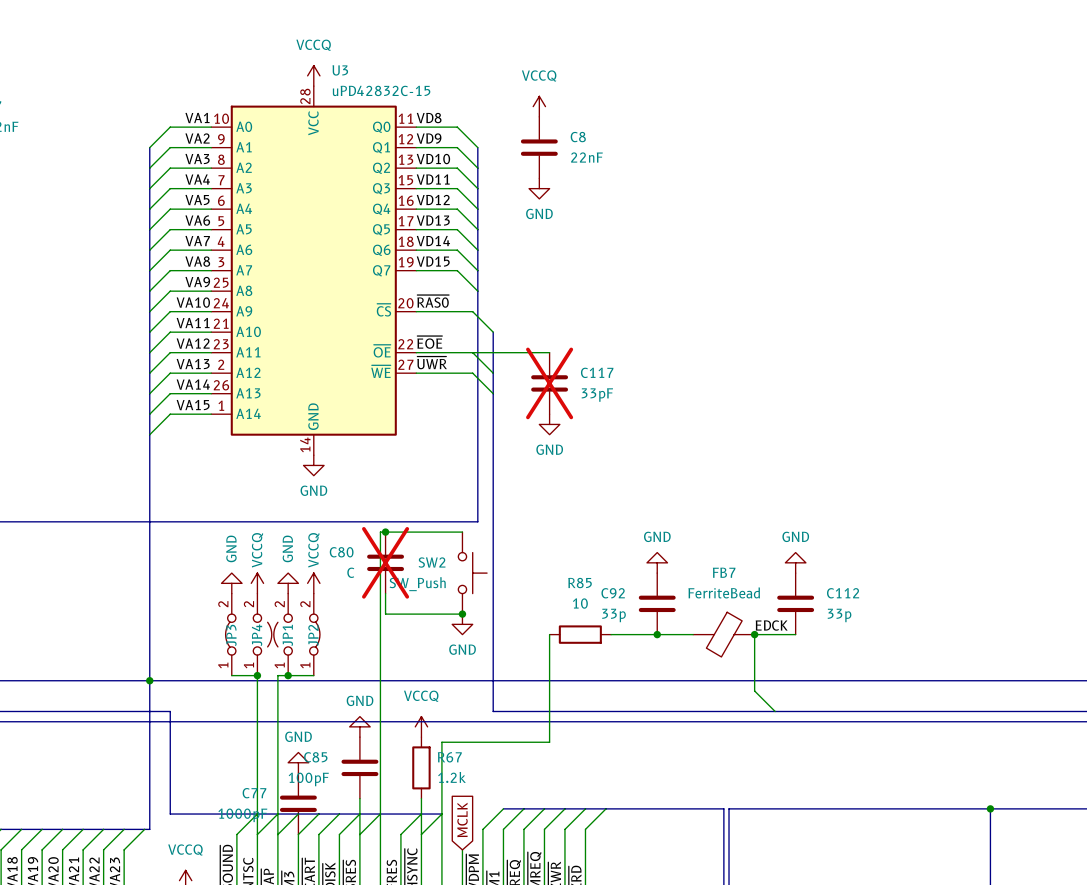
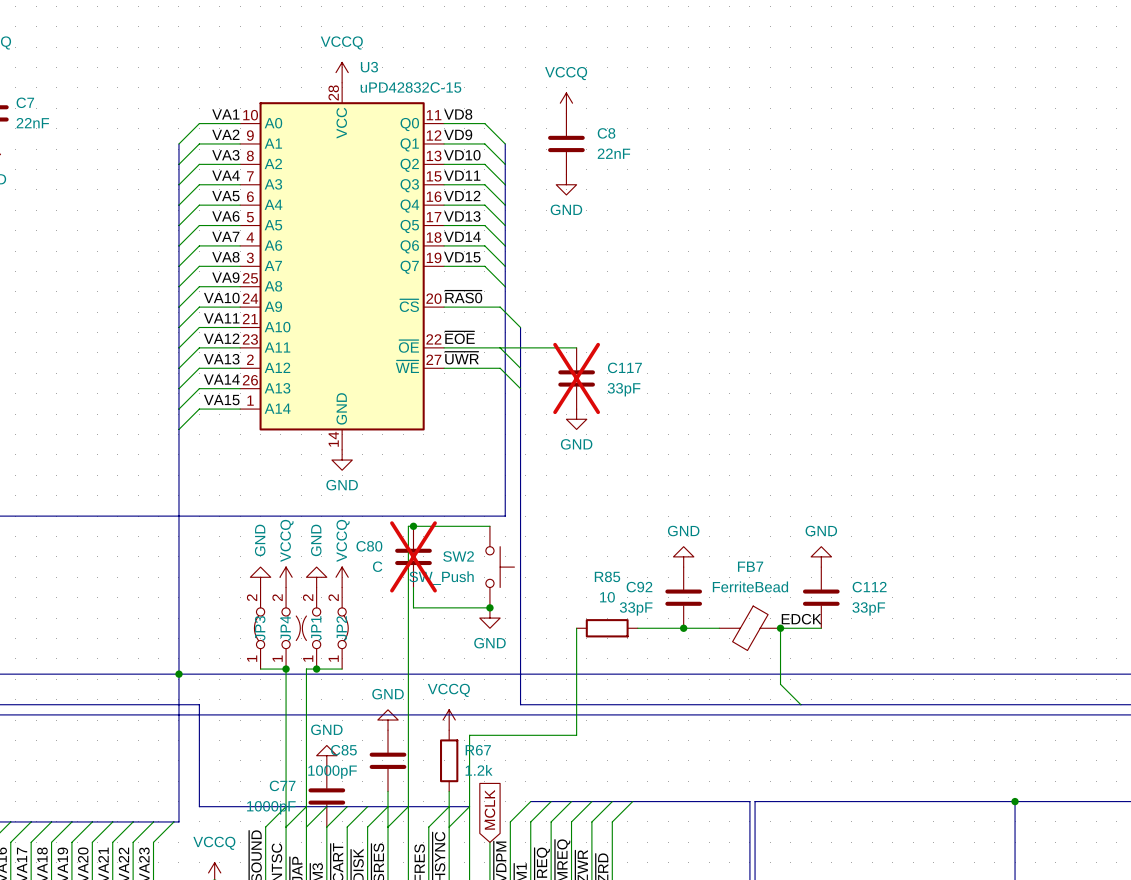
C92 value: 33p (614, 615) -> 33pF (636, 608)
C112 value: 33p (839, 615) -> 33pF (868, 608)
C85 value: 100pF (308, 779) -> 1000pF (332, 772)

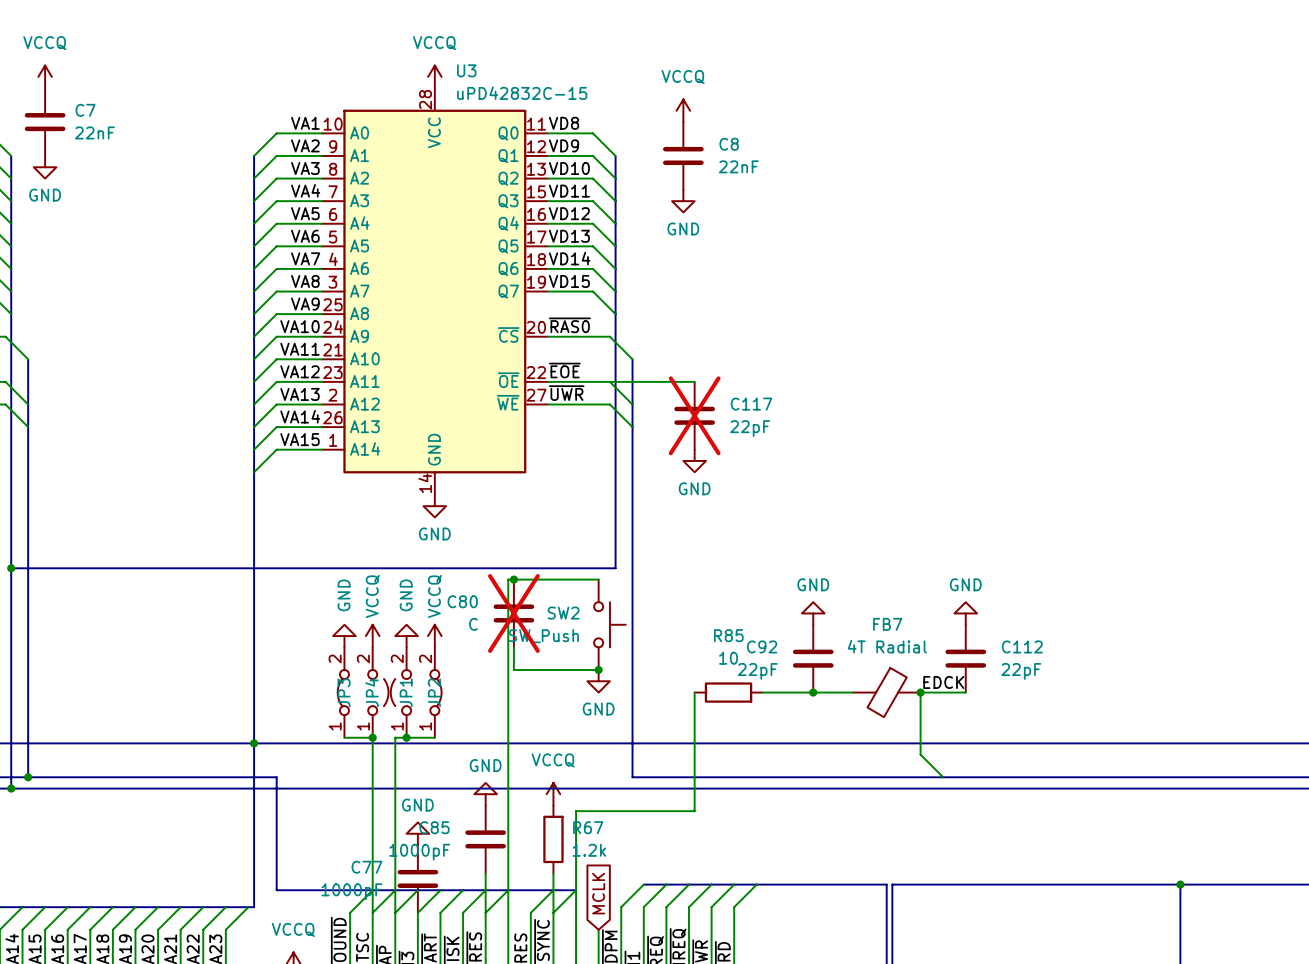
C117 value: 33pF (624, 389) -> 22pF (750, 428)
FB7 value: FerriteBead (750, 586) -> 4T Radial (887, 646)
C92 value: 33pF (636, 608) -> 22pF (757, 671)
C112 value: 33pF (868, 608) -> 22pF (1021, 671)

